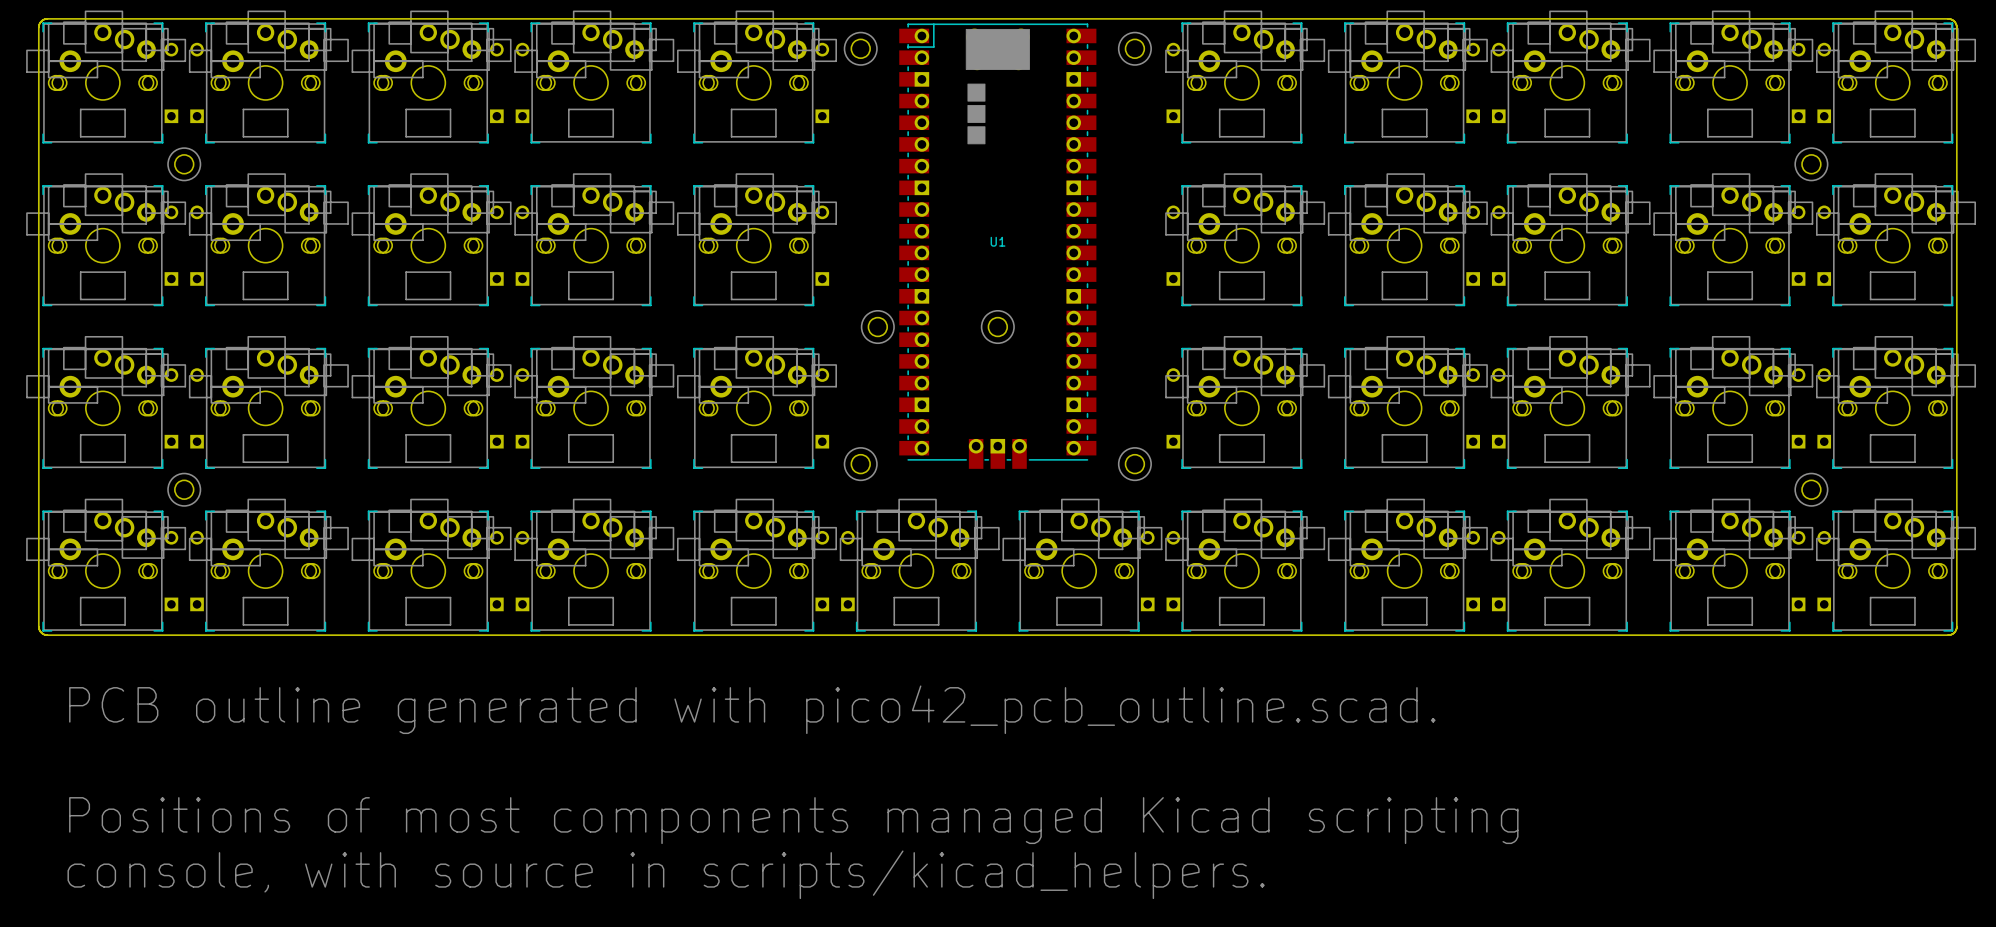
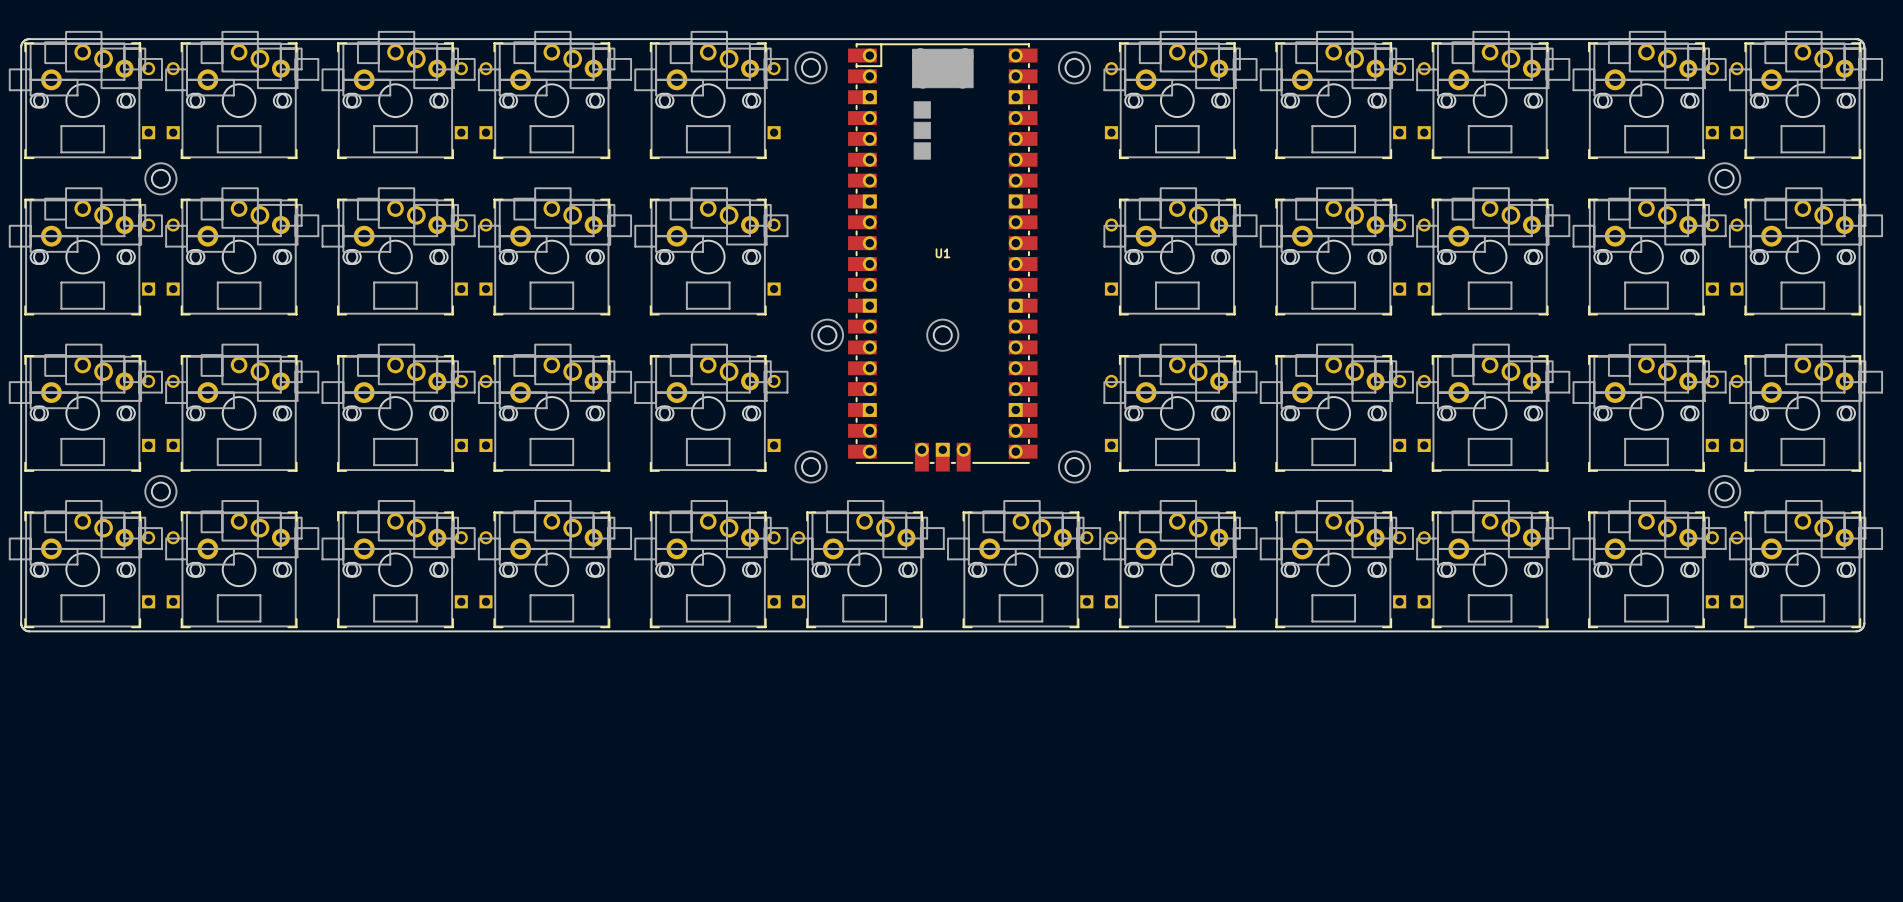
text: PCB outline generated with pico42_pcb_outline.scad. (752, 709) -> none
text: Positions of most components managed Kicad scripting (793, 820) -> none
text: console, with source in scripts/kicad_helpers. (666, 874) -> none

